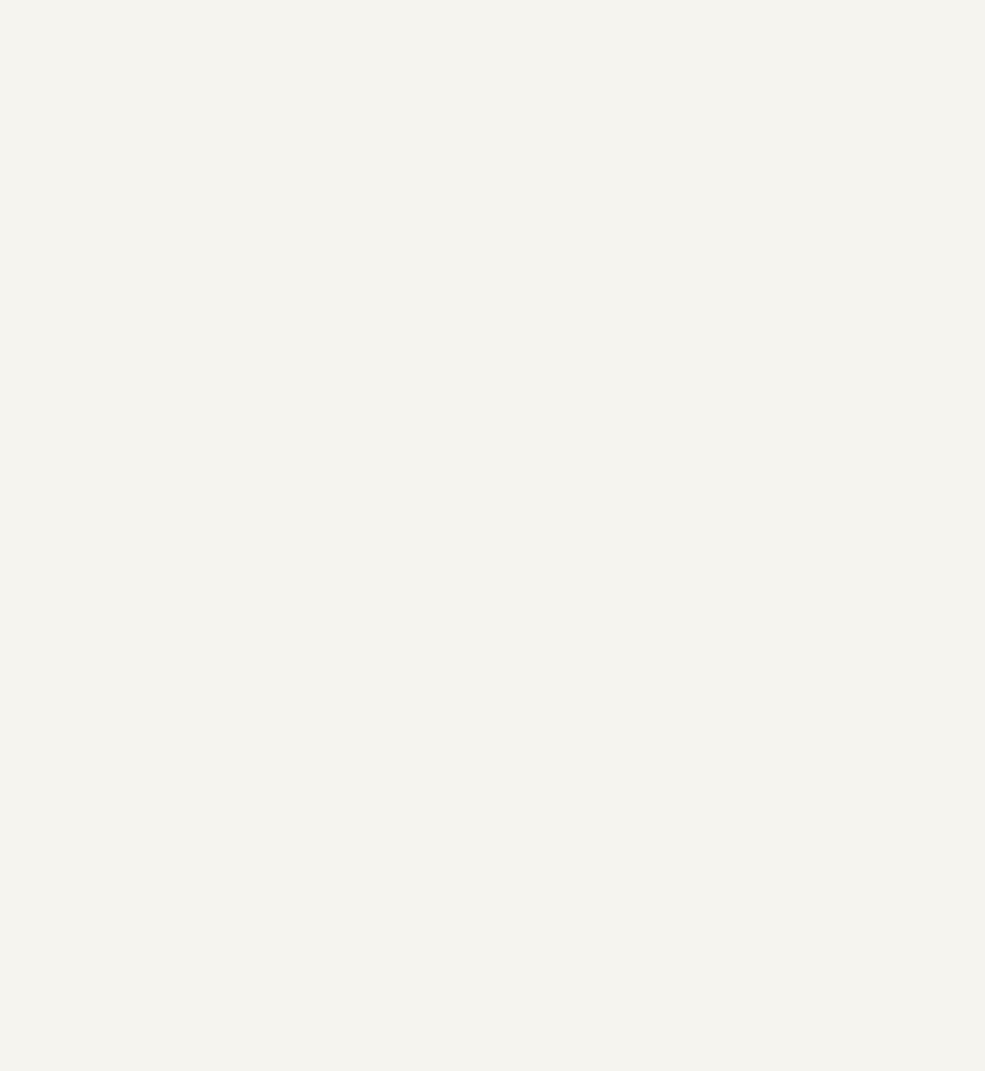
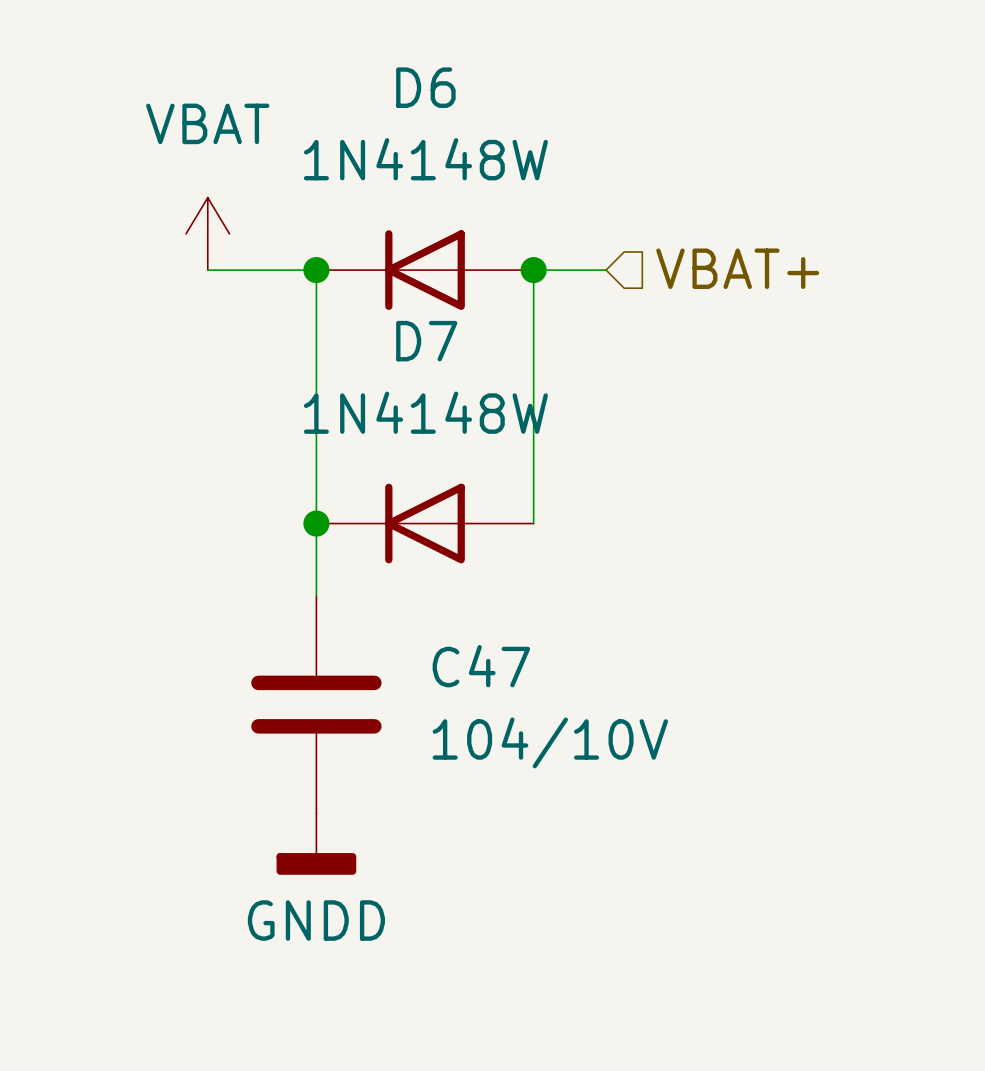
power symbol: none -> VBAT (207, 233)
hierarchical label: none -> VBAT+ (737, 268)
wire: none -> (207, 270) (316, 270) (316, 595)
junction: none -> (316, 270)
D6: none -> 1N4148W (425, 270)
junction: none -> (533, 270)
wire: none -> (606, 270) (533, 270) (533, 523)
junction: none -> (316, 523)
D7: none -> 1N4148W (425, 523)
C47: none -> 104/10V (316, 704)
power symbol: none -> GNDD (316, 844)

